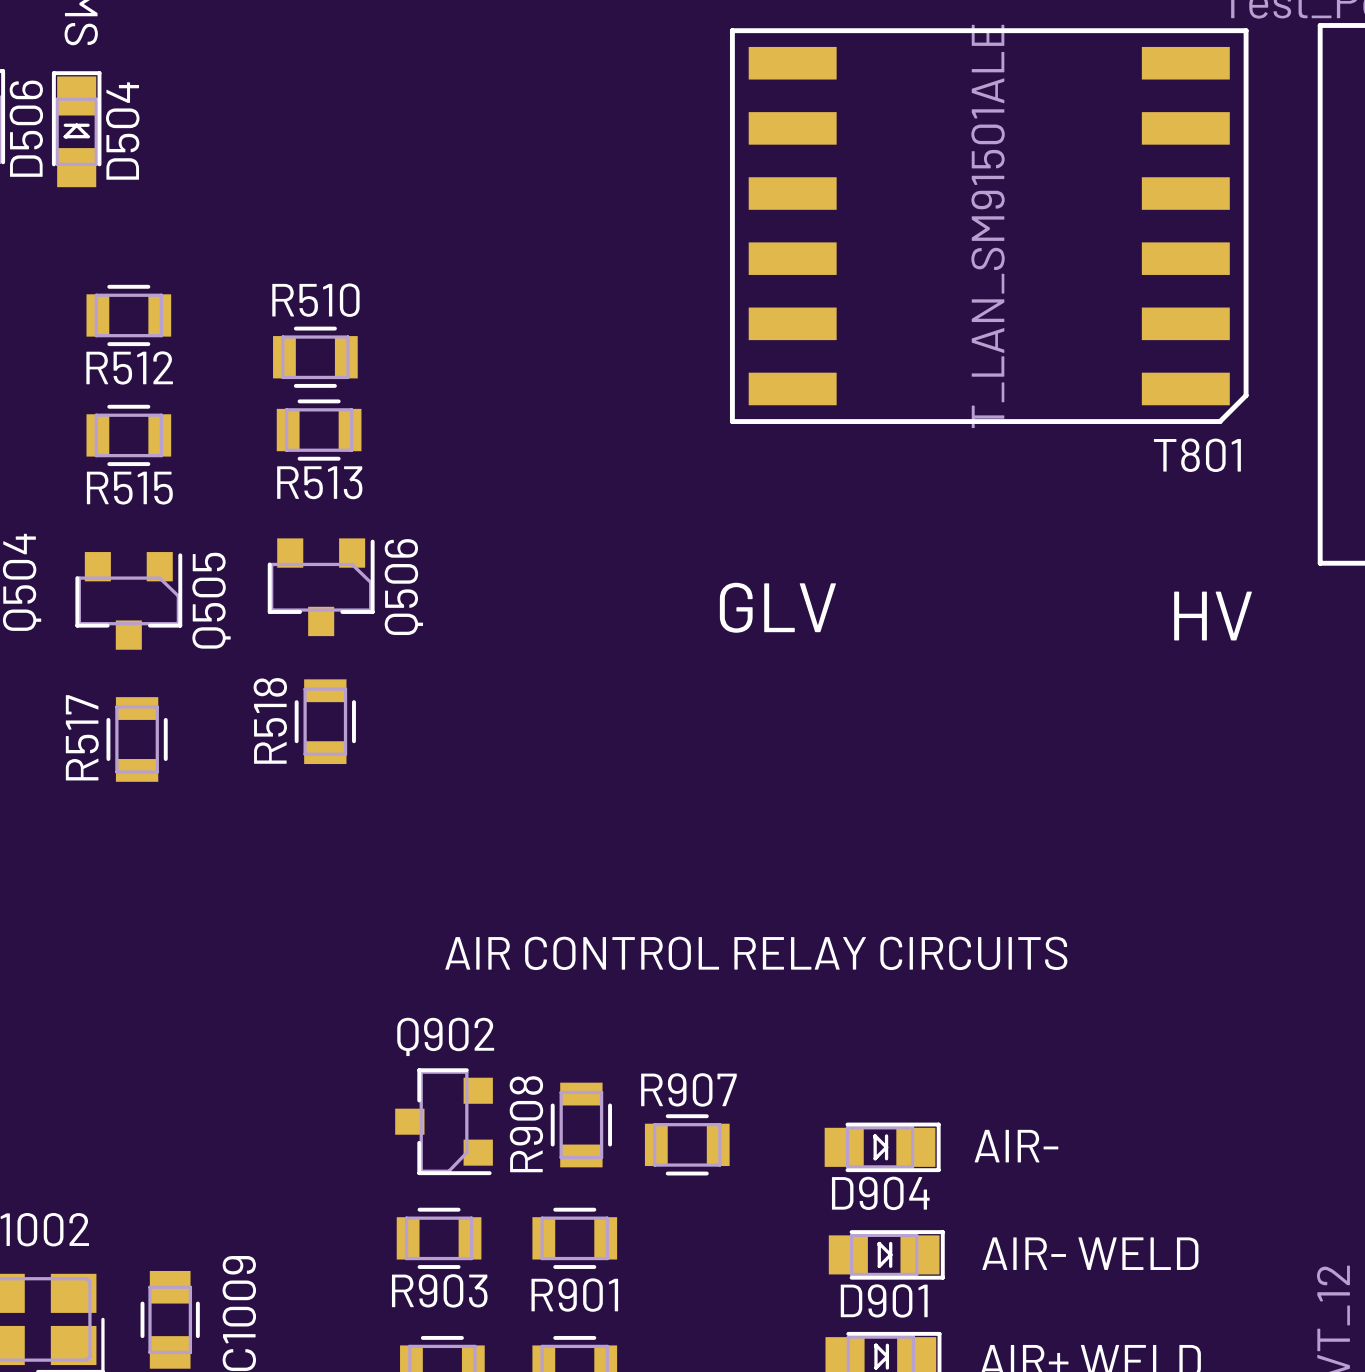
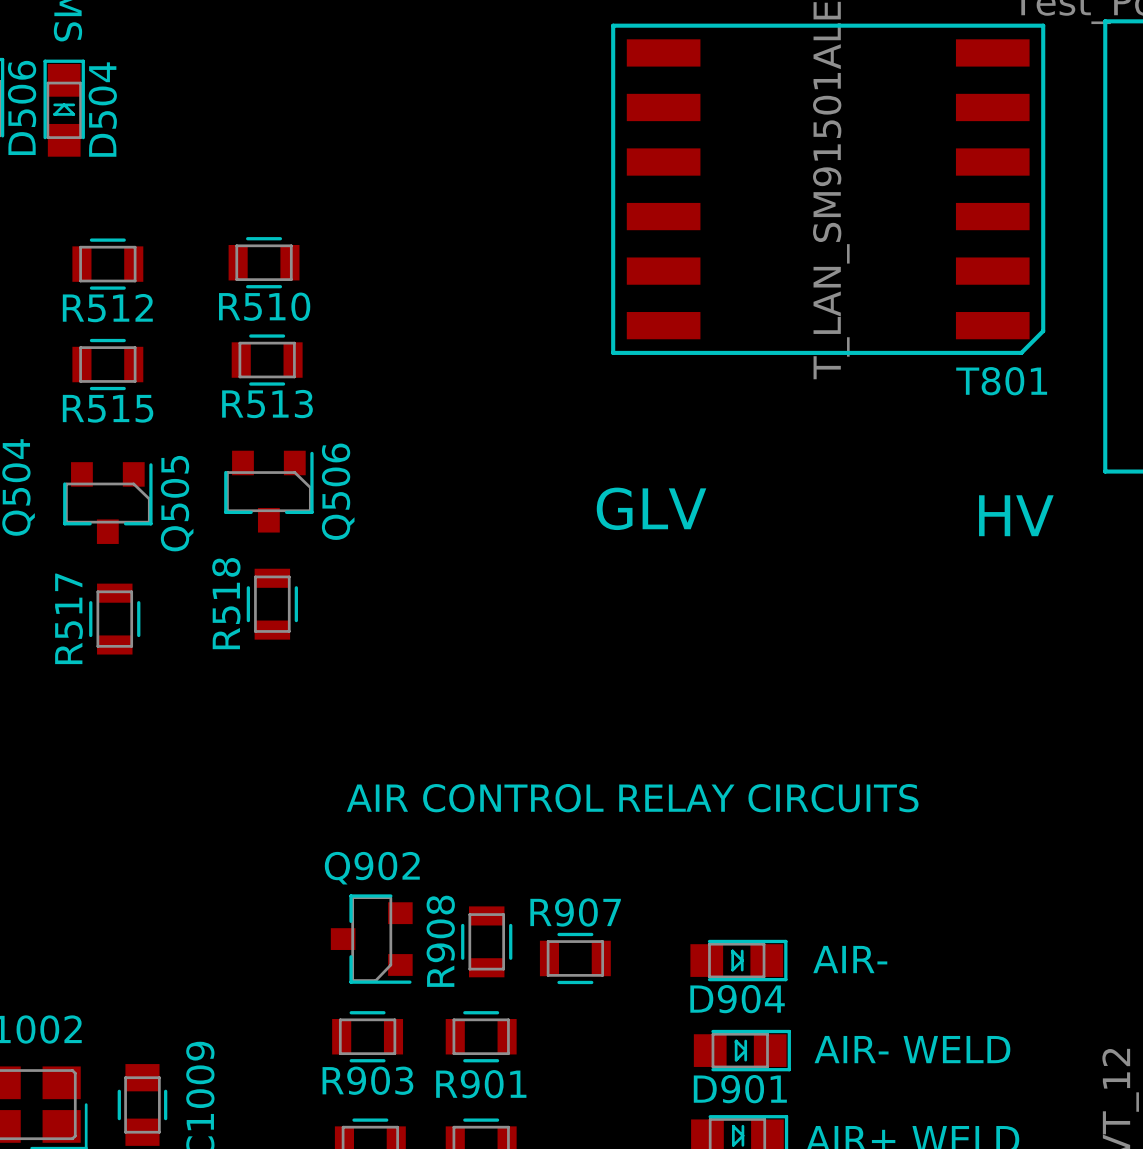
R510 name position: R510 (315, 300) -> R510 (264, 306)
R510 position: (315, 357) -> (264, 262)

